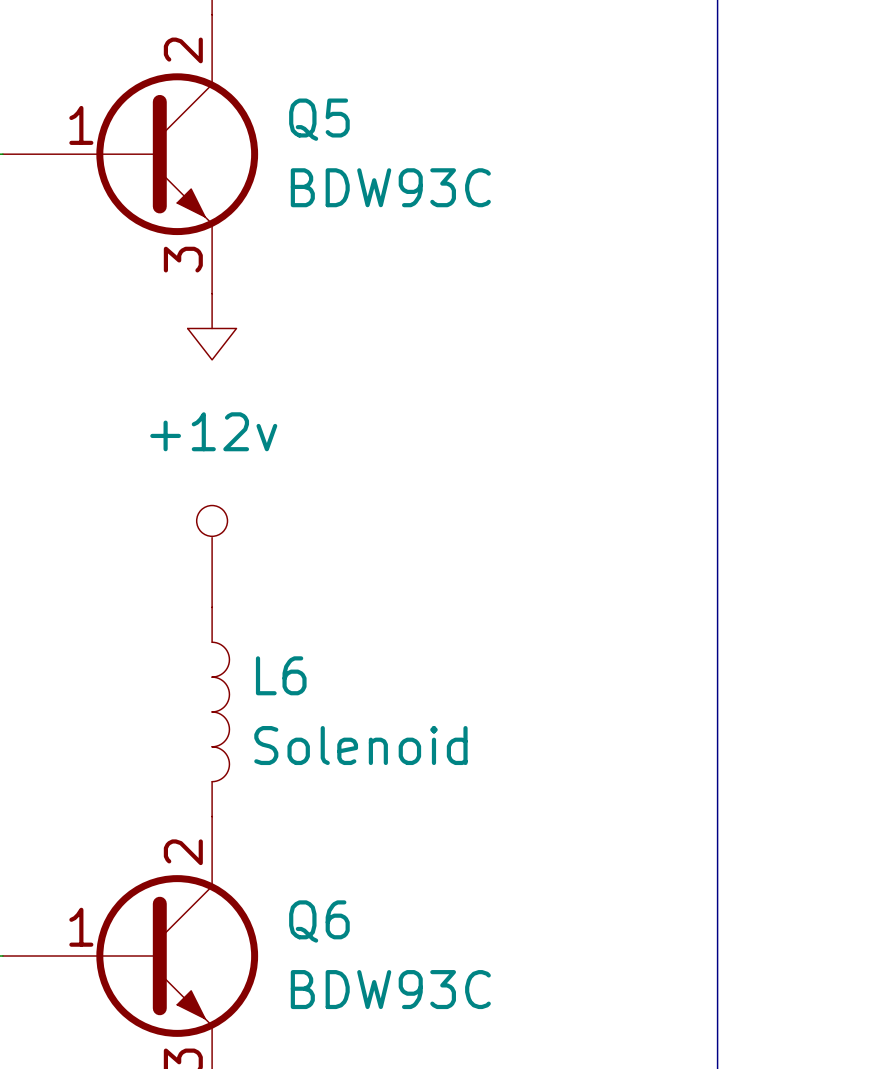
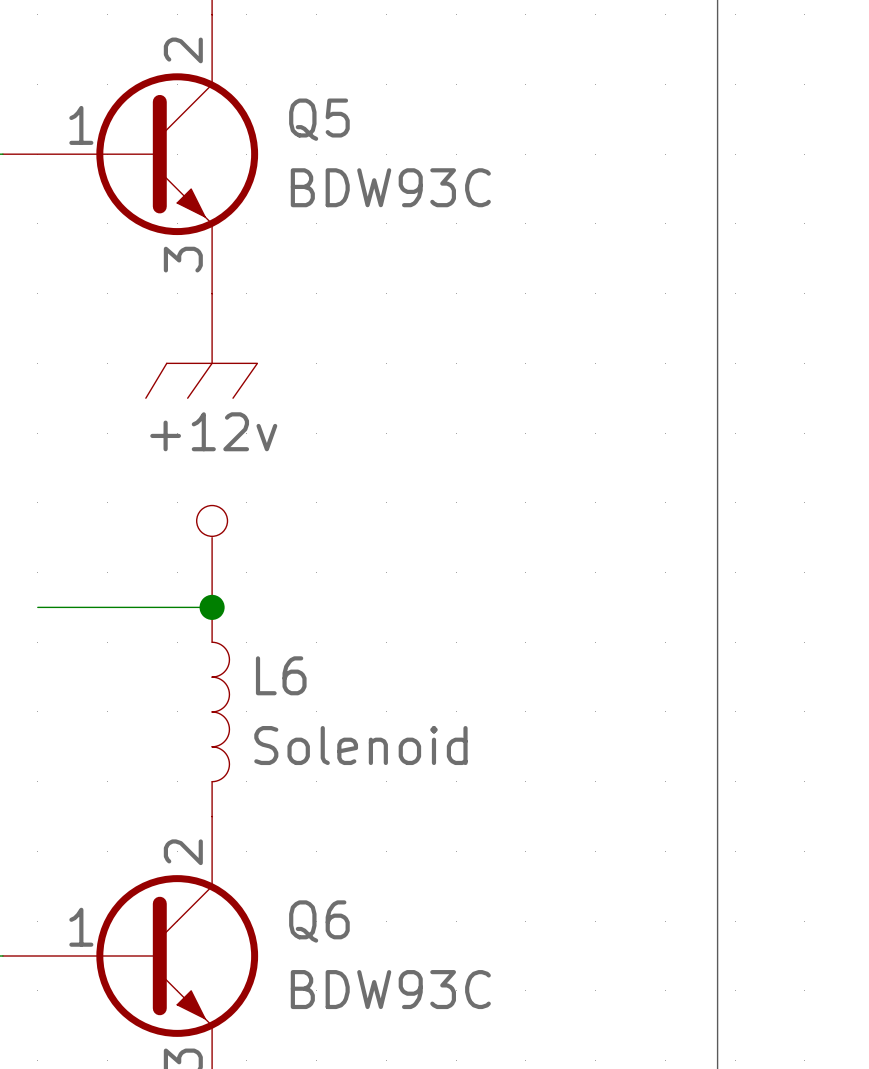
power symbol shape: [187, 293, 237, 360] -> [145, 293, 258, 399]
wire: none -> (37, 607) (212, 607)
junction: none -> (212, 607)

